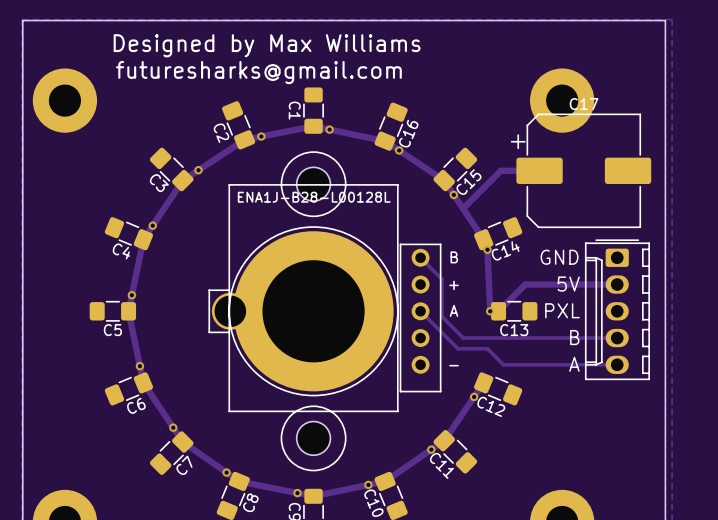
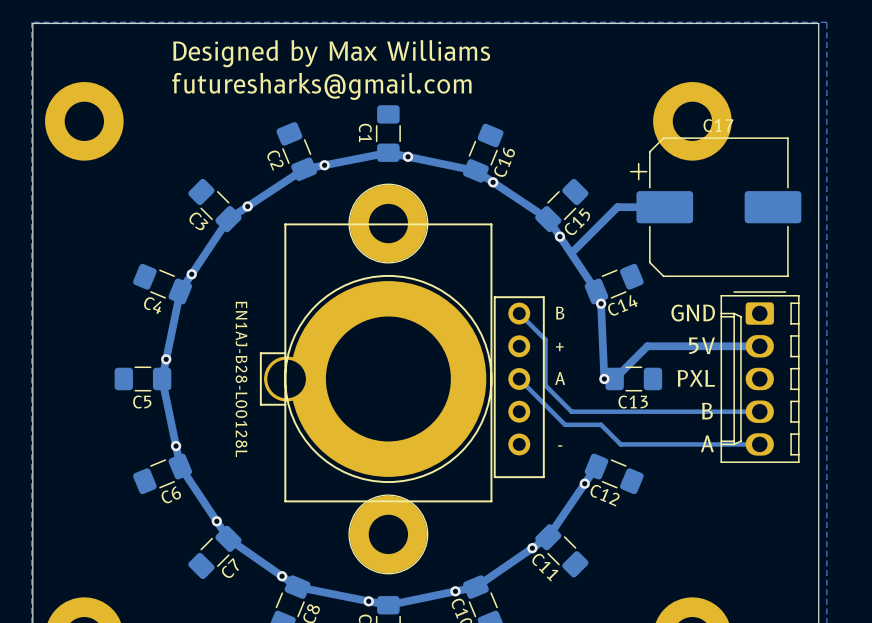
part footprint: [296, 167, 331, 202] -> [349, 184, 428, 263]
part text: ENA1J-B28-L00128L (314, 197) -> none
part text: none -> EN1AJ-B28-L00128L (241, 379)
part footprint: [296, 421, 331, 456] -> [349, 495, 428, 574]

